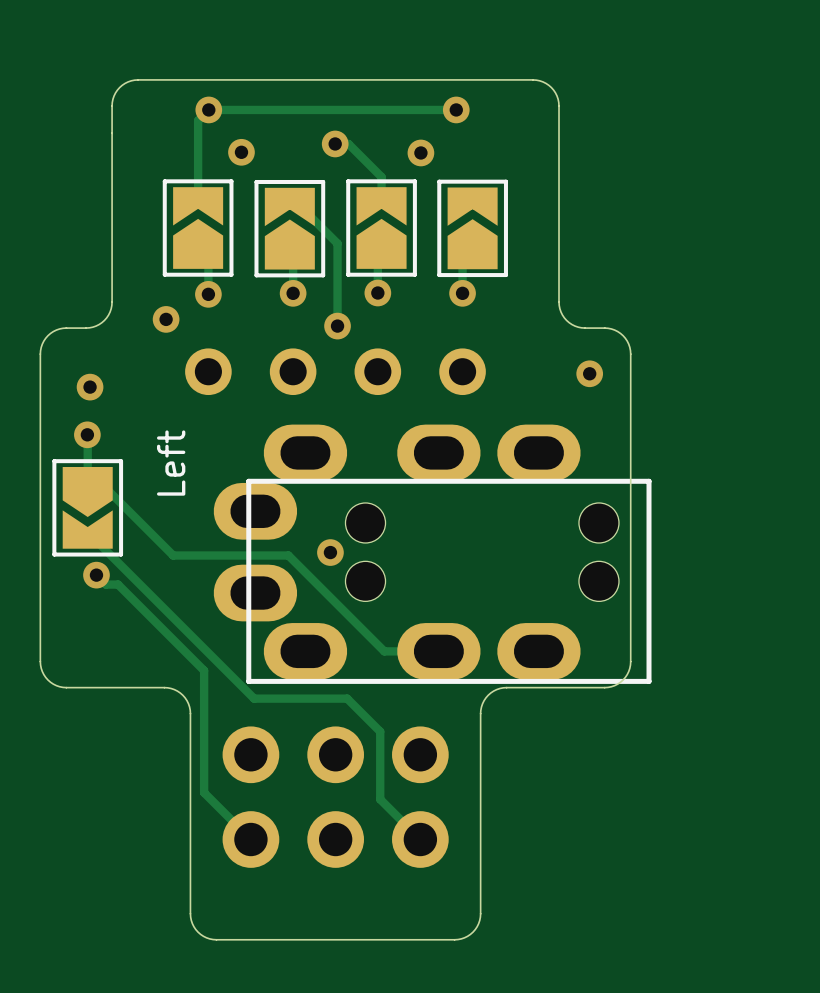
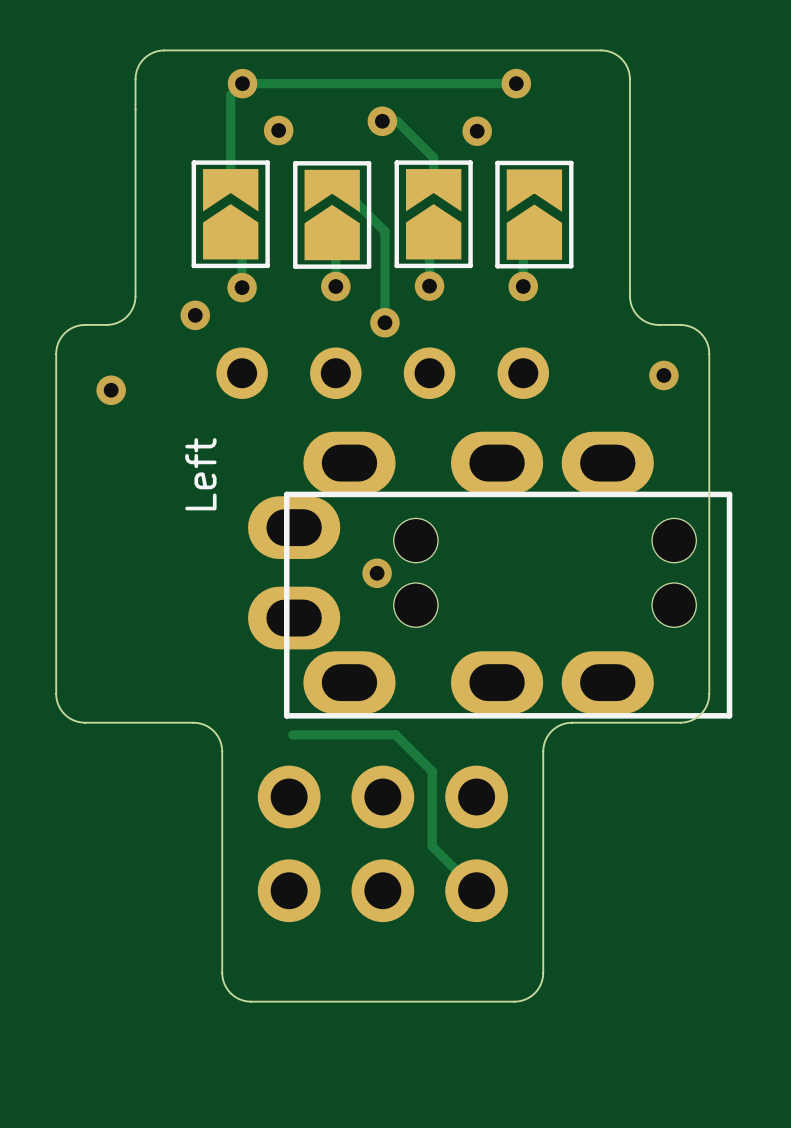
via: (87, 434) -> none
track: (87, 435) (87, 483) (101, 483) (173, 555) (288, 555) (384, 651) (438, 651) -> none
part: (87, 507) -> none
track: (87, 532) (254, 698) -> none
track: (96, 575) (105, 584) (118, 584) (204, 670) (204, 792) (250, 839) -> none
via: (96, 575) -> none

